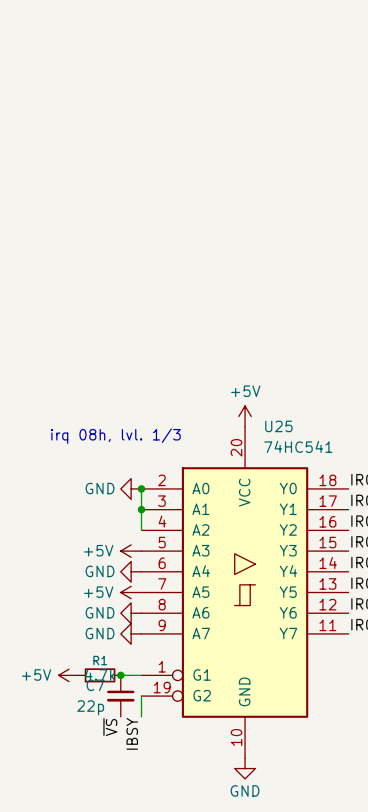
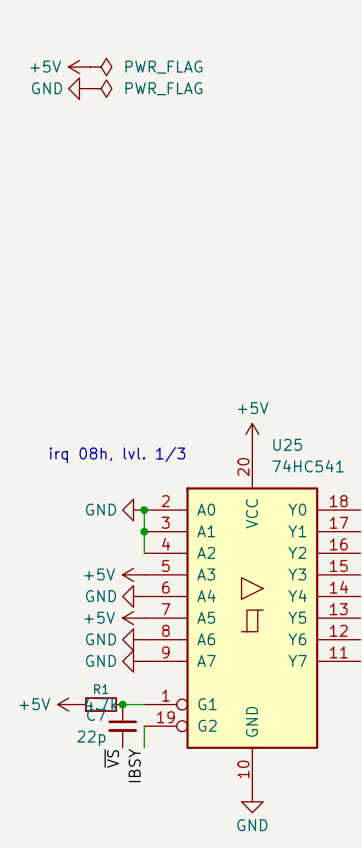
power symbol: none -> +5V (79, 67)
power symbol: none -> PWR_FLAG (101, 67)
power symbol: none -> GND (79, 88)
power symbol: none -> PWR_FLAG (101, 88)

